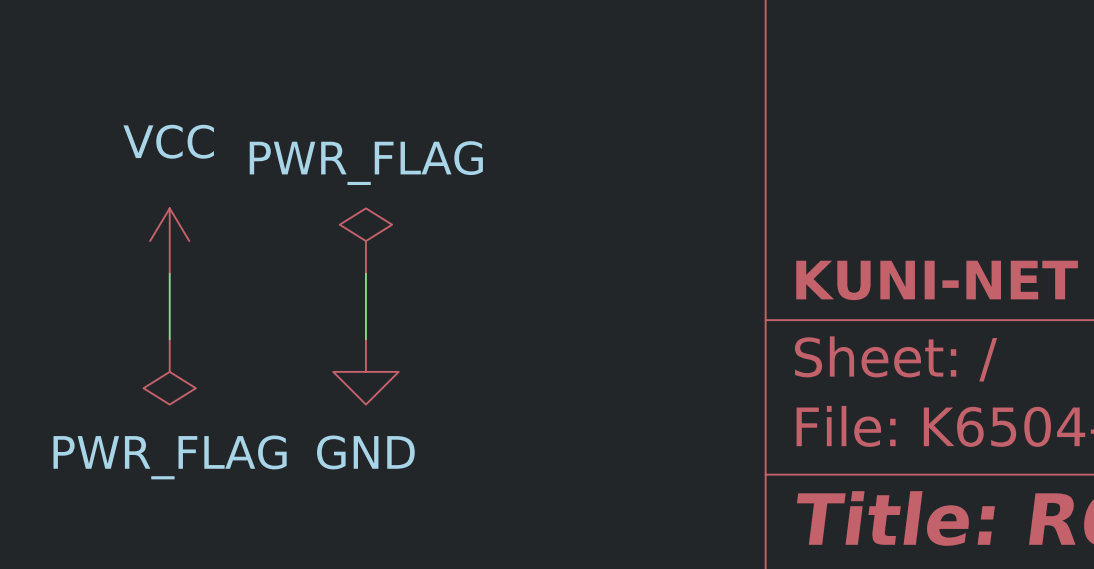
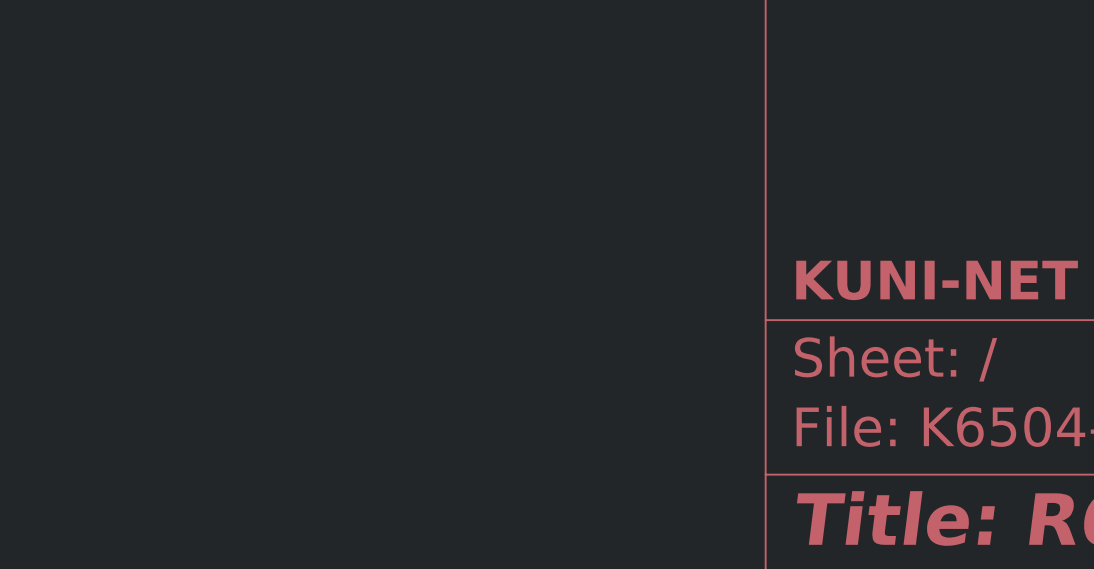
power symbol: VCC (169, 241) -> none
power symbol: PWR_FLAG (365, 241) -> none
wire: (169, 273) (169, 339) -> none
wire: (365, 273) (365, 339) -> none
power symbol: PWR_FLAG (169, 371) -> none
power symbol: GND (365, 371) -> none

